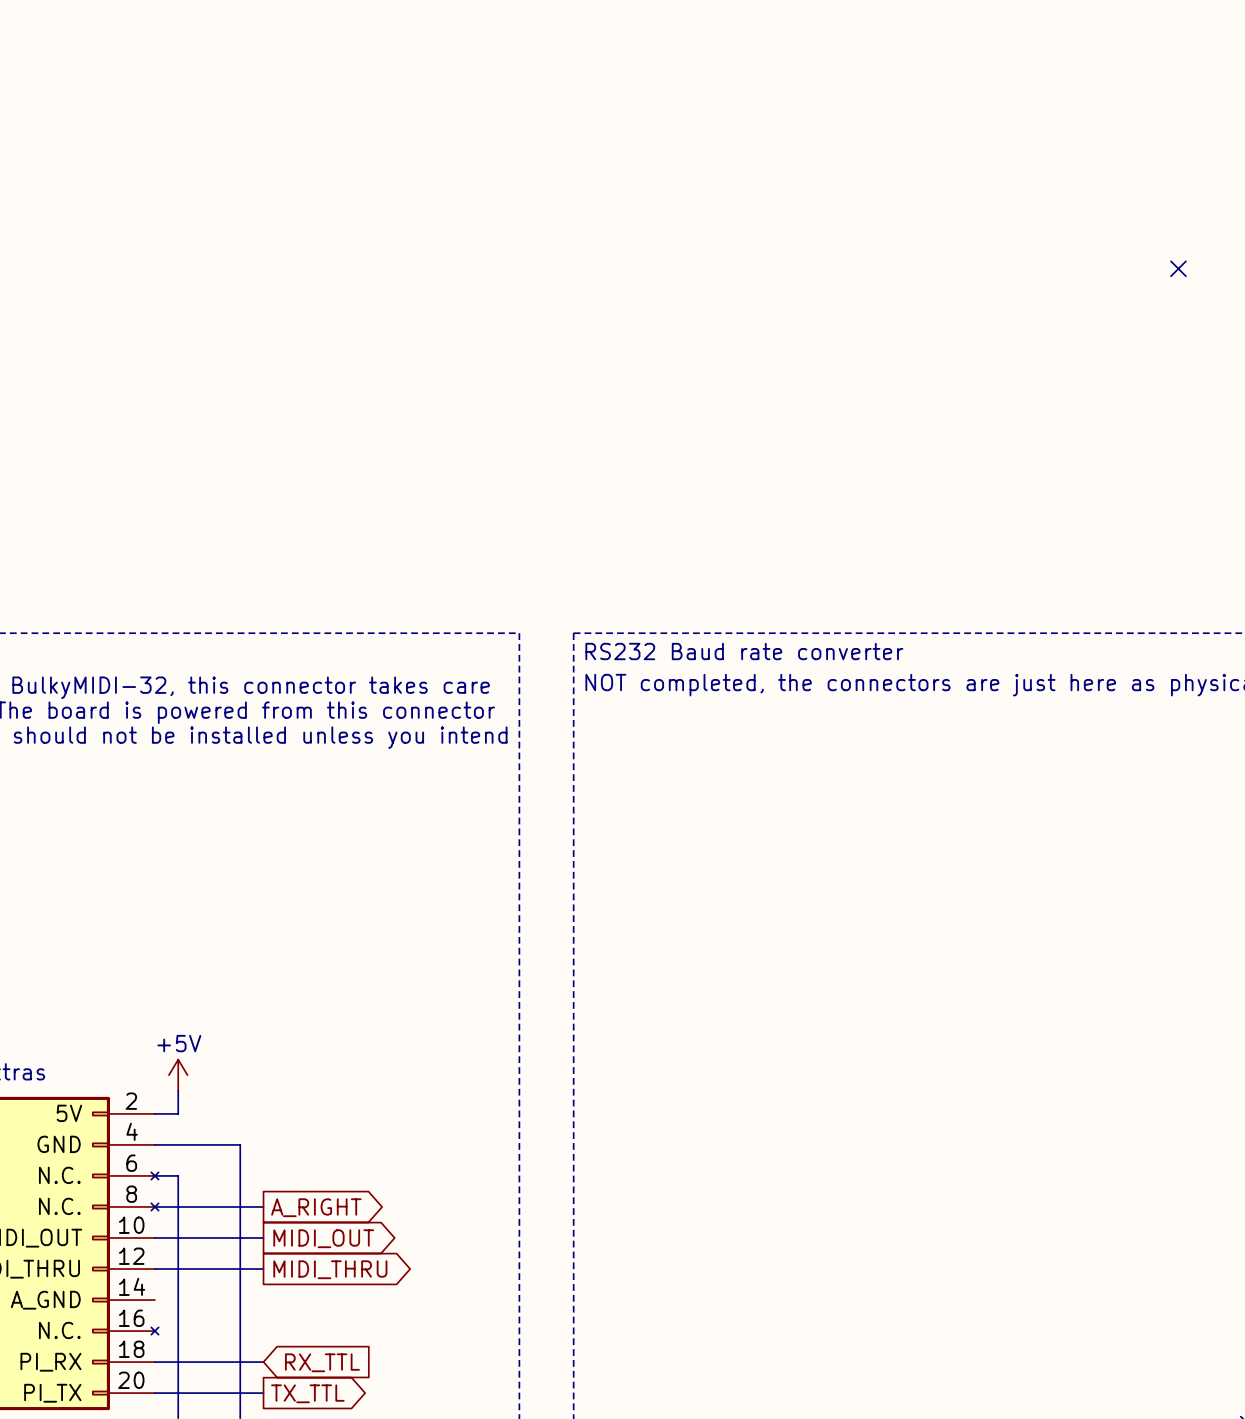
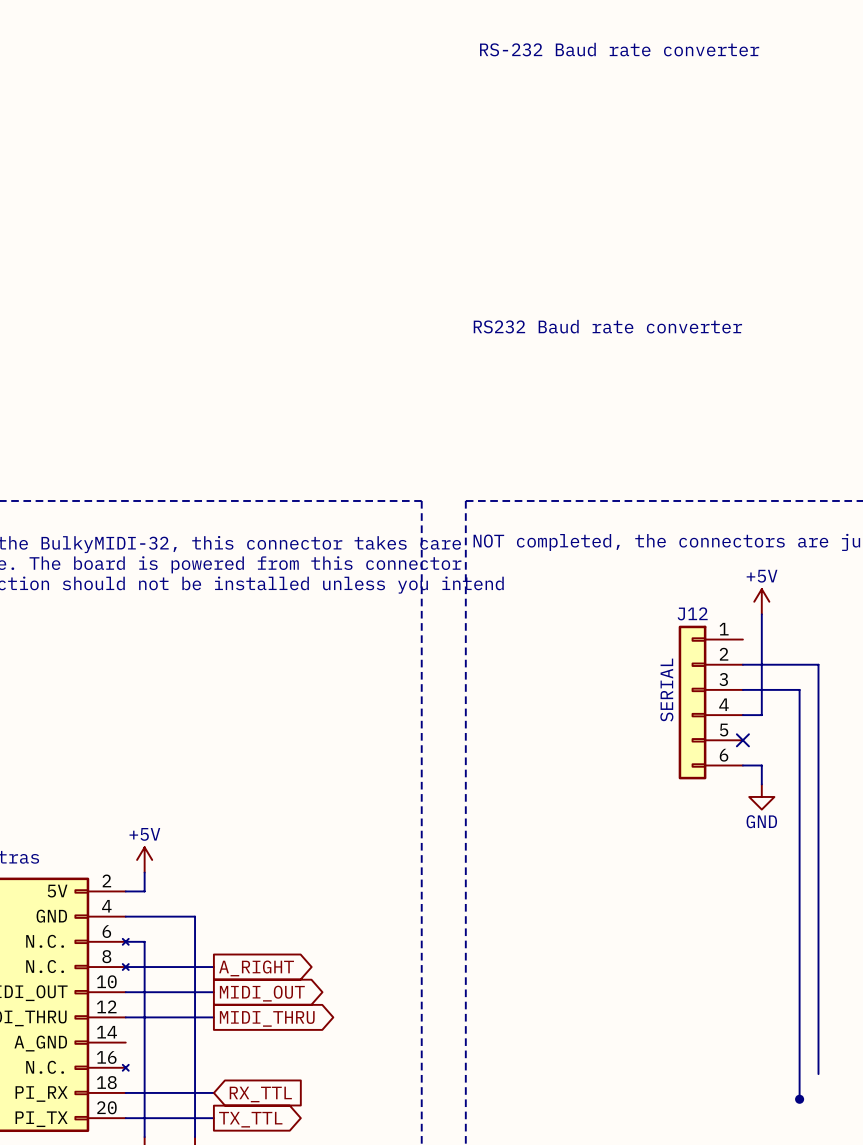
text: none -> RS-232 Baud rate converter (619, 49)
text position: RS232 Baud rate converter (744, 651) -> RS232 Baud rate converter (607, 326)
power symbol: none -> +5V (761, 601)
wire: none -> (761, 614) (761, 715) (742, 715)
wire: none -> (742, 664) (818, 664) (818, 1074)
wire: none -> (742, 689) (799, 689) (799, 1099)
J12: none -> SERIAL (710, 702)
no-connect mark: none -> (742, 740)
wire: none -> (742, 765) (761, 765) (761, 784)
power symbol: none -> GND (761, 796)
junction: none -> (799, 1099)

